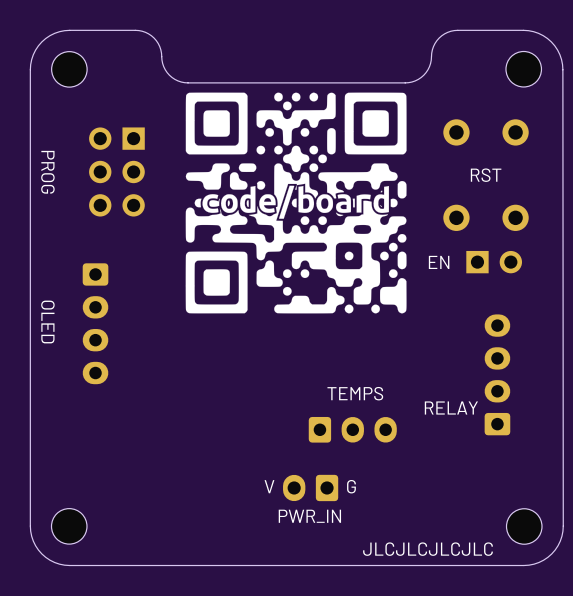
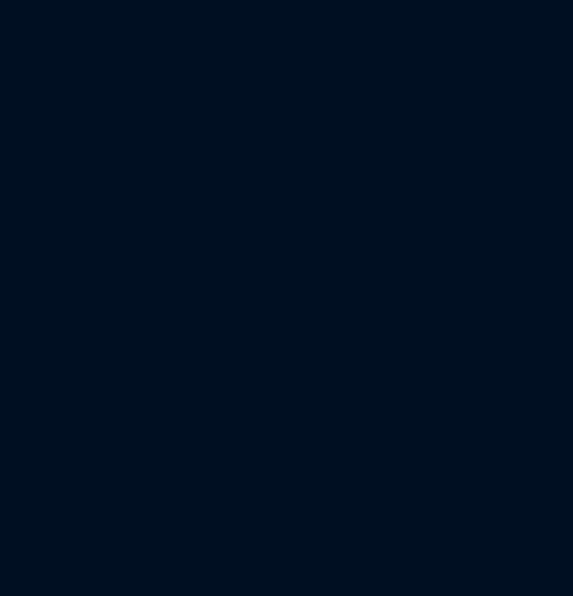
board edge: (523, 30) (457, 30) (447, 32) (435, 43) (430, 63) (426, 72) (418, 79) (405, 82) (184, 82) (174, 79) (167, 72) (162, 63) (158, 43) (151, 35) (142, 31) (64, 30) (54, 33) (41, 41) (33, 54) (30, 69) (30, 526) (33, 541) (41, 553) (54, 562) (69, 565) (523, 565) (538, 562) (551, 553) (560, 541) (563, 526) (562, 69) (559, 54) (551, 41) (538, 33) (523, 30) -> none
part: (69, 69) -> none
part: (523, 69) -> none
drawing: [185, 92, 407, 314] -> none
part: (116, 171) -> none
part: (486, 175) -> none
part: (494, 262) -> none
part: (95, 323) -> none
part: (497, 374) -> none
part: (352, 429) -> none
part: (310, 487) -> none
part: (69, 526) -> none
part: (524, 526) -> none
text: JLCJLCJLCJLC (428, 549) -> none

